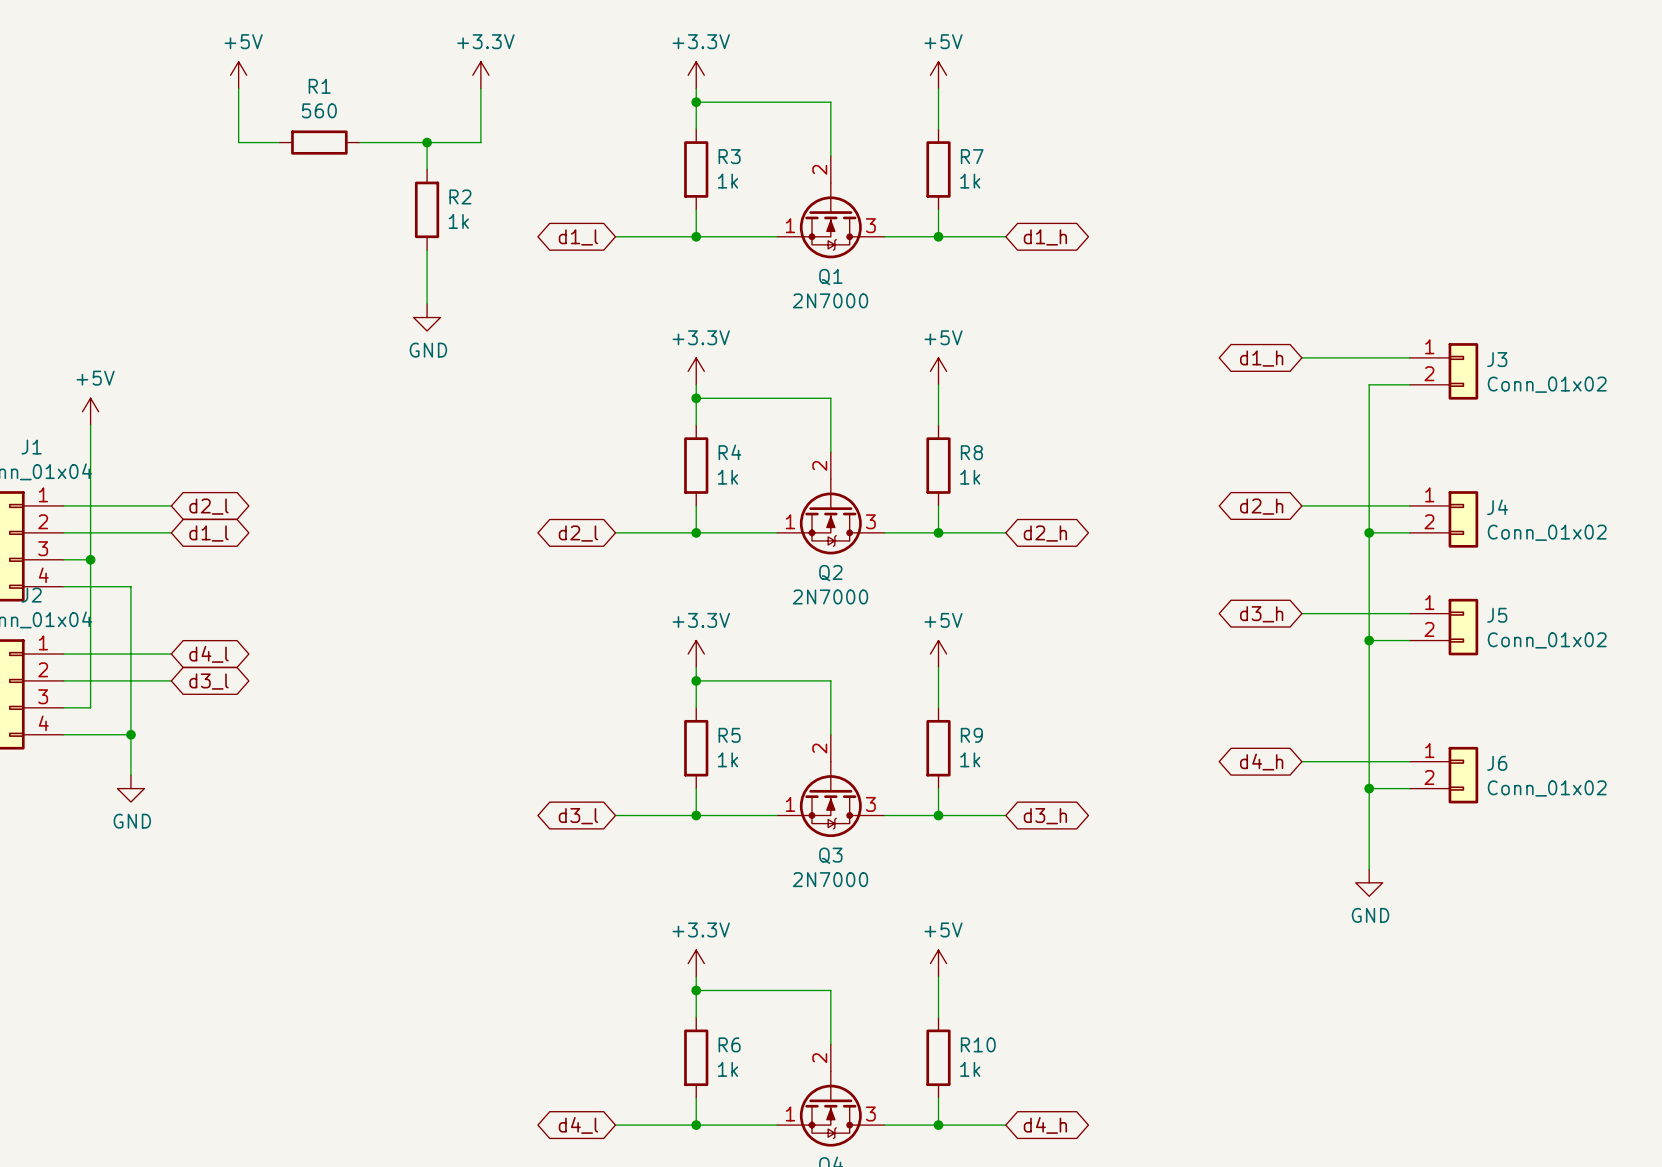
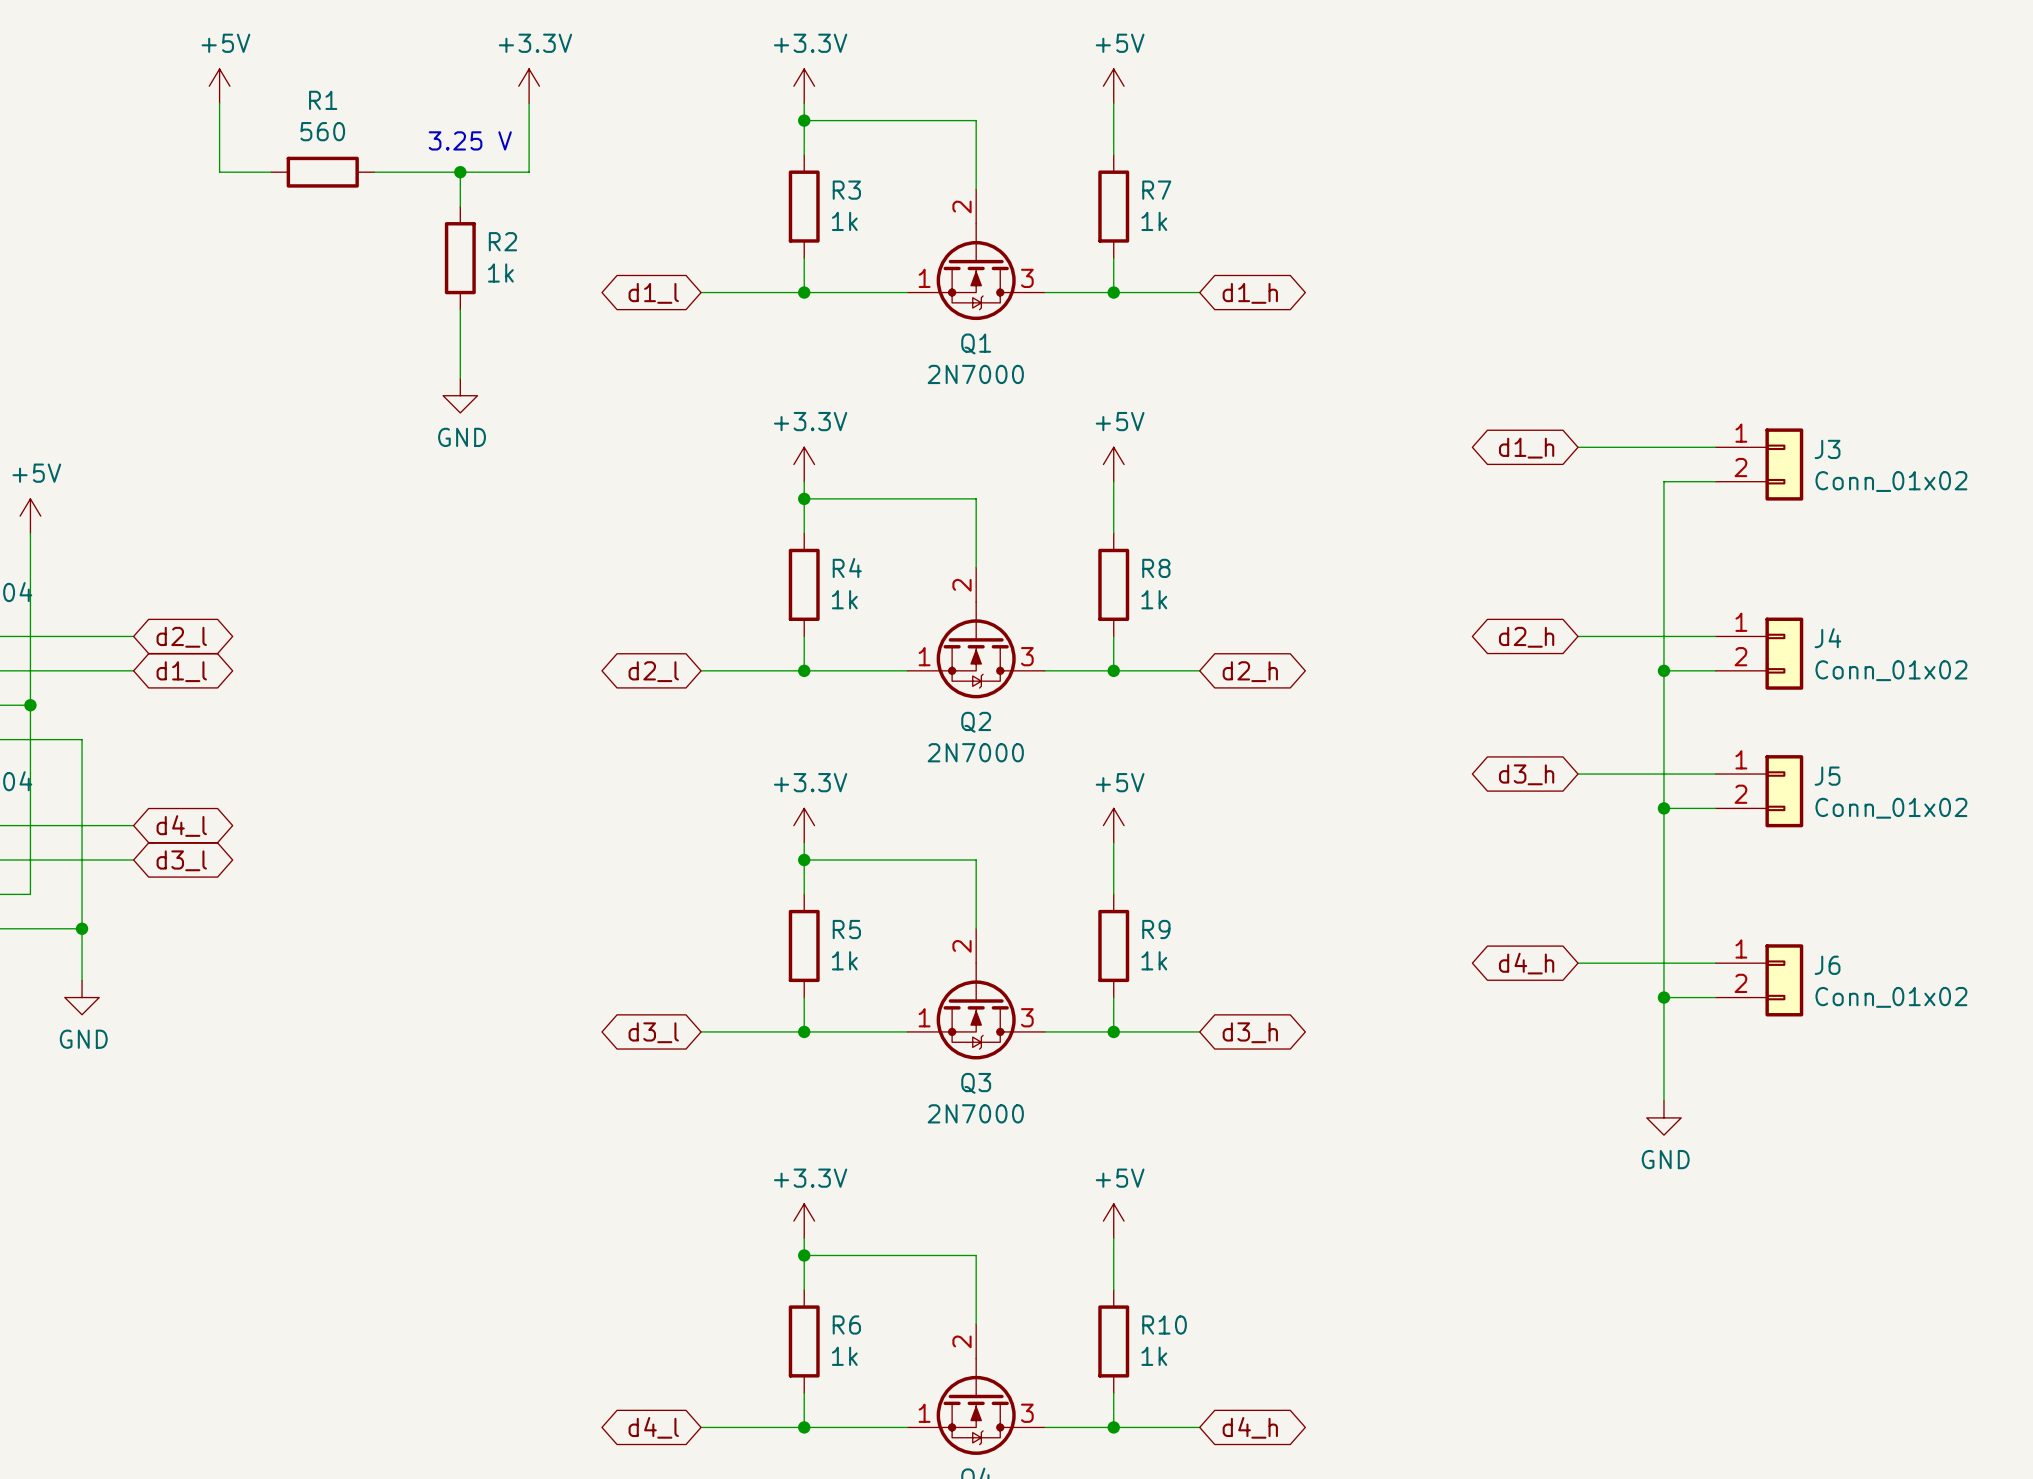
text: none -> 3.25 V (470, 140)

